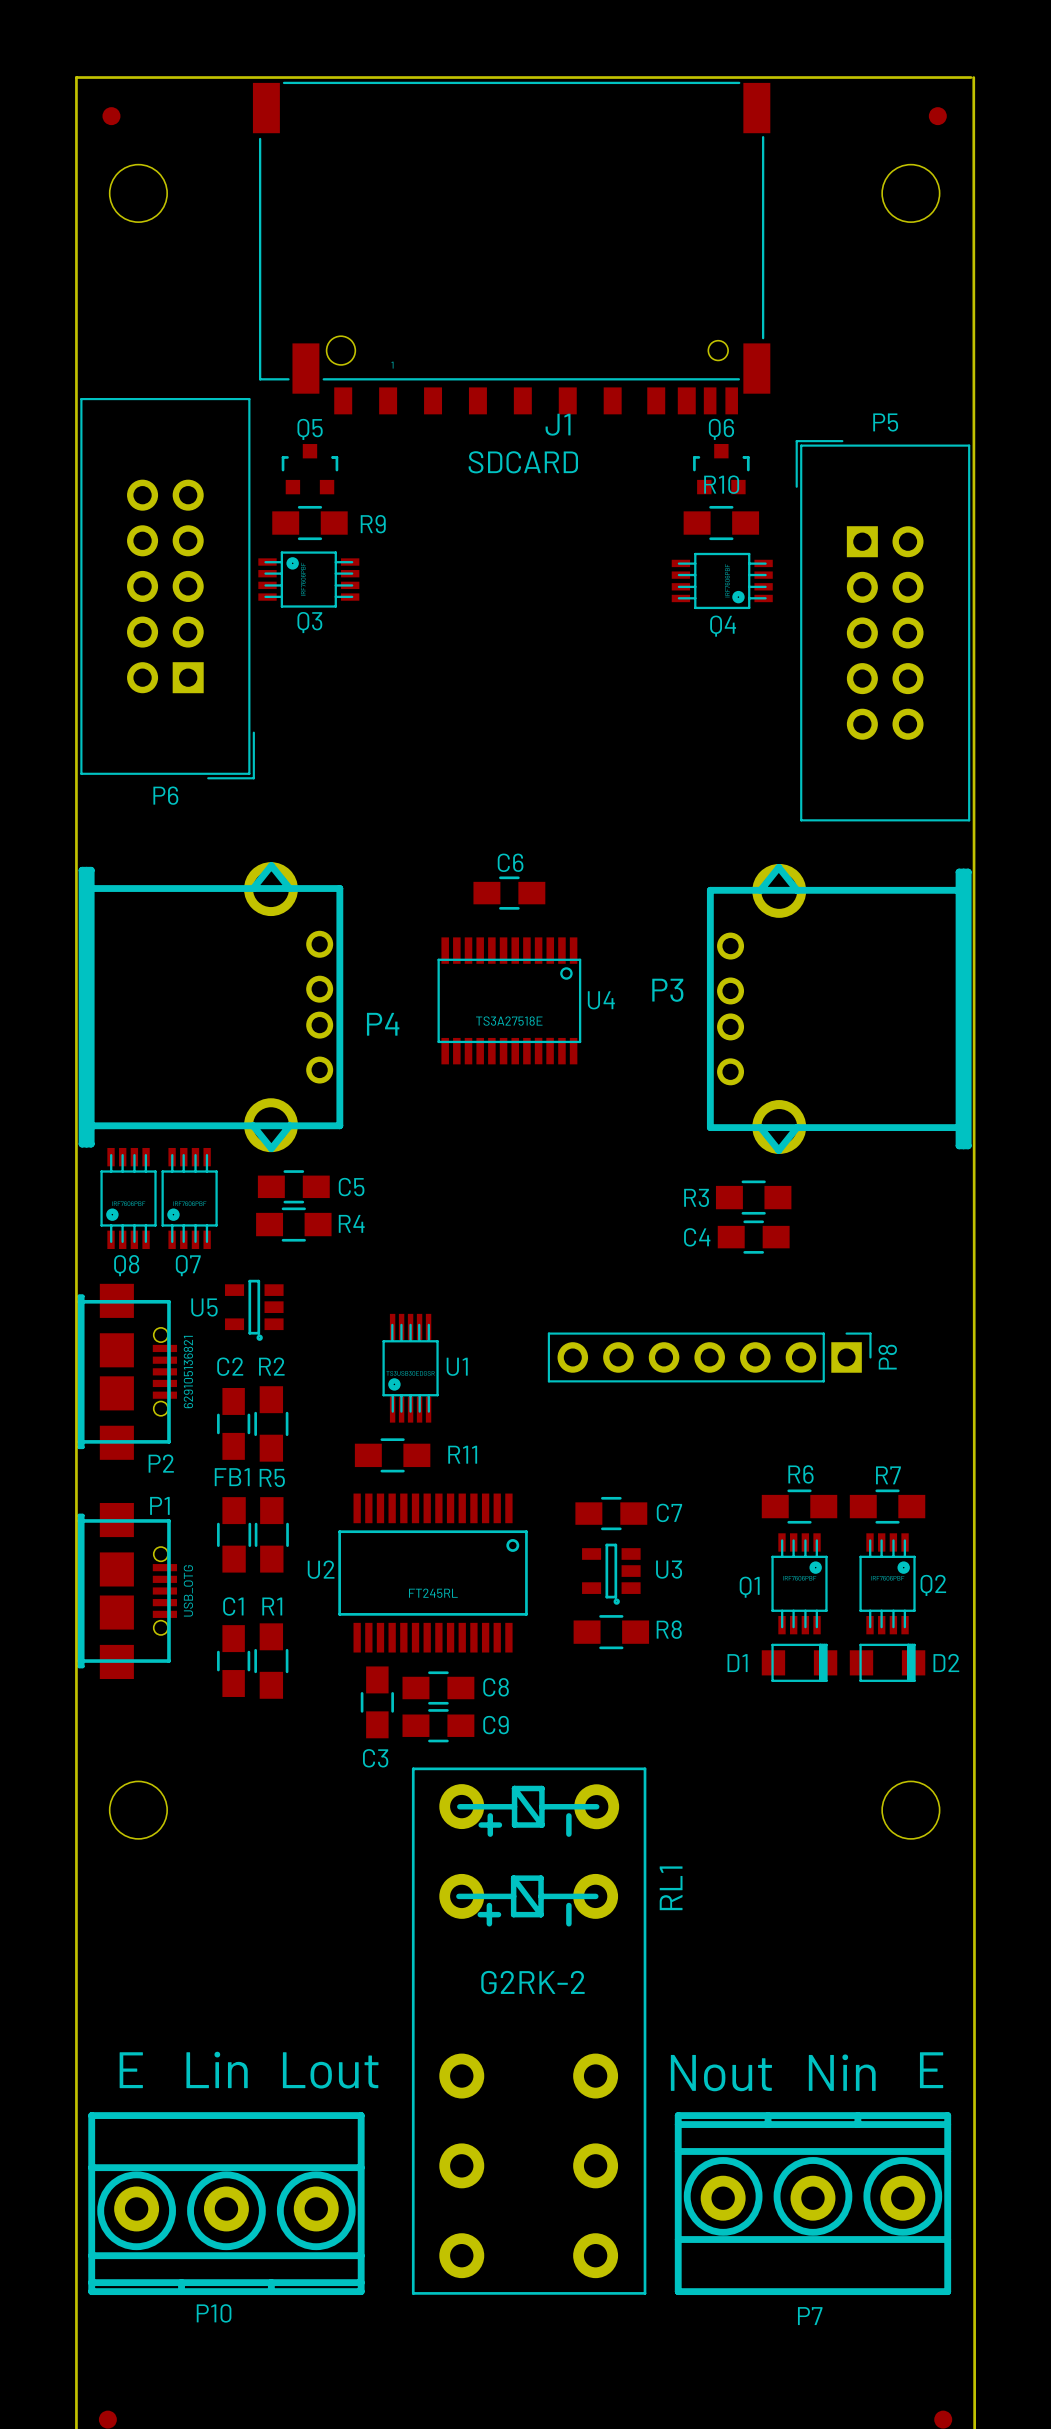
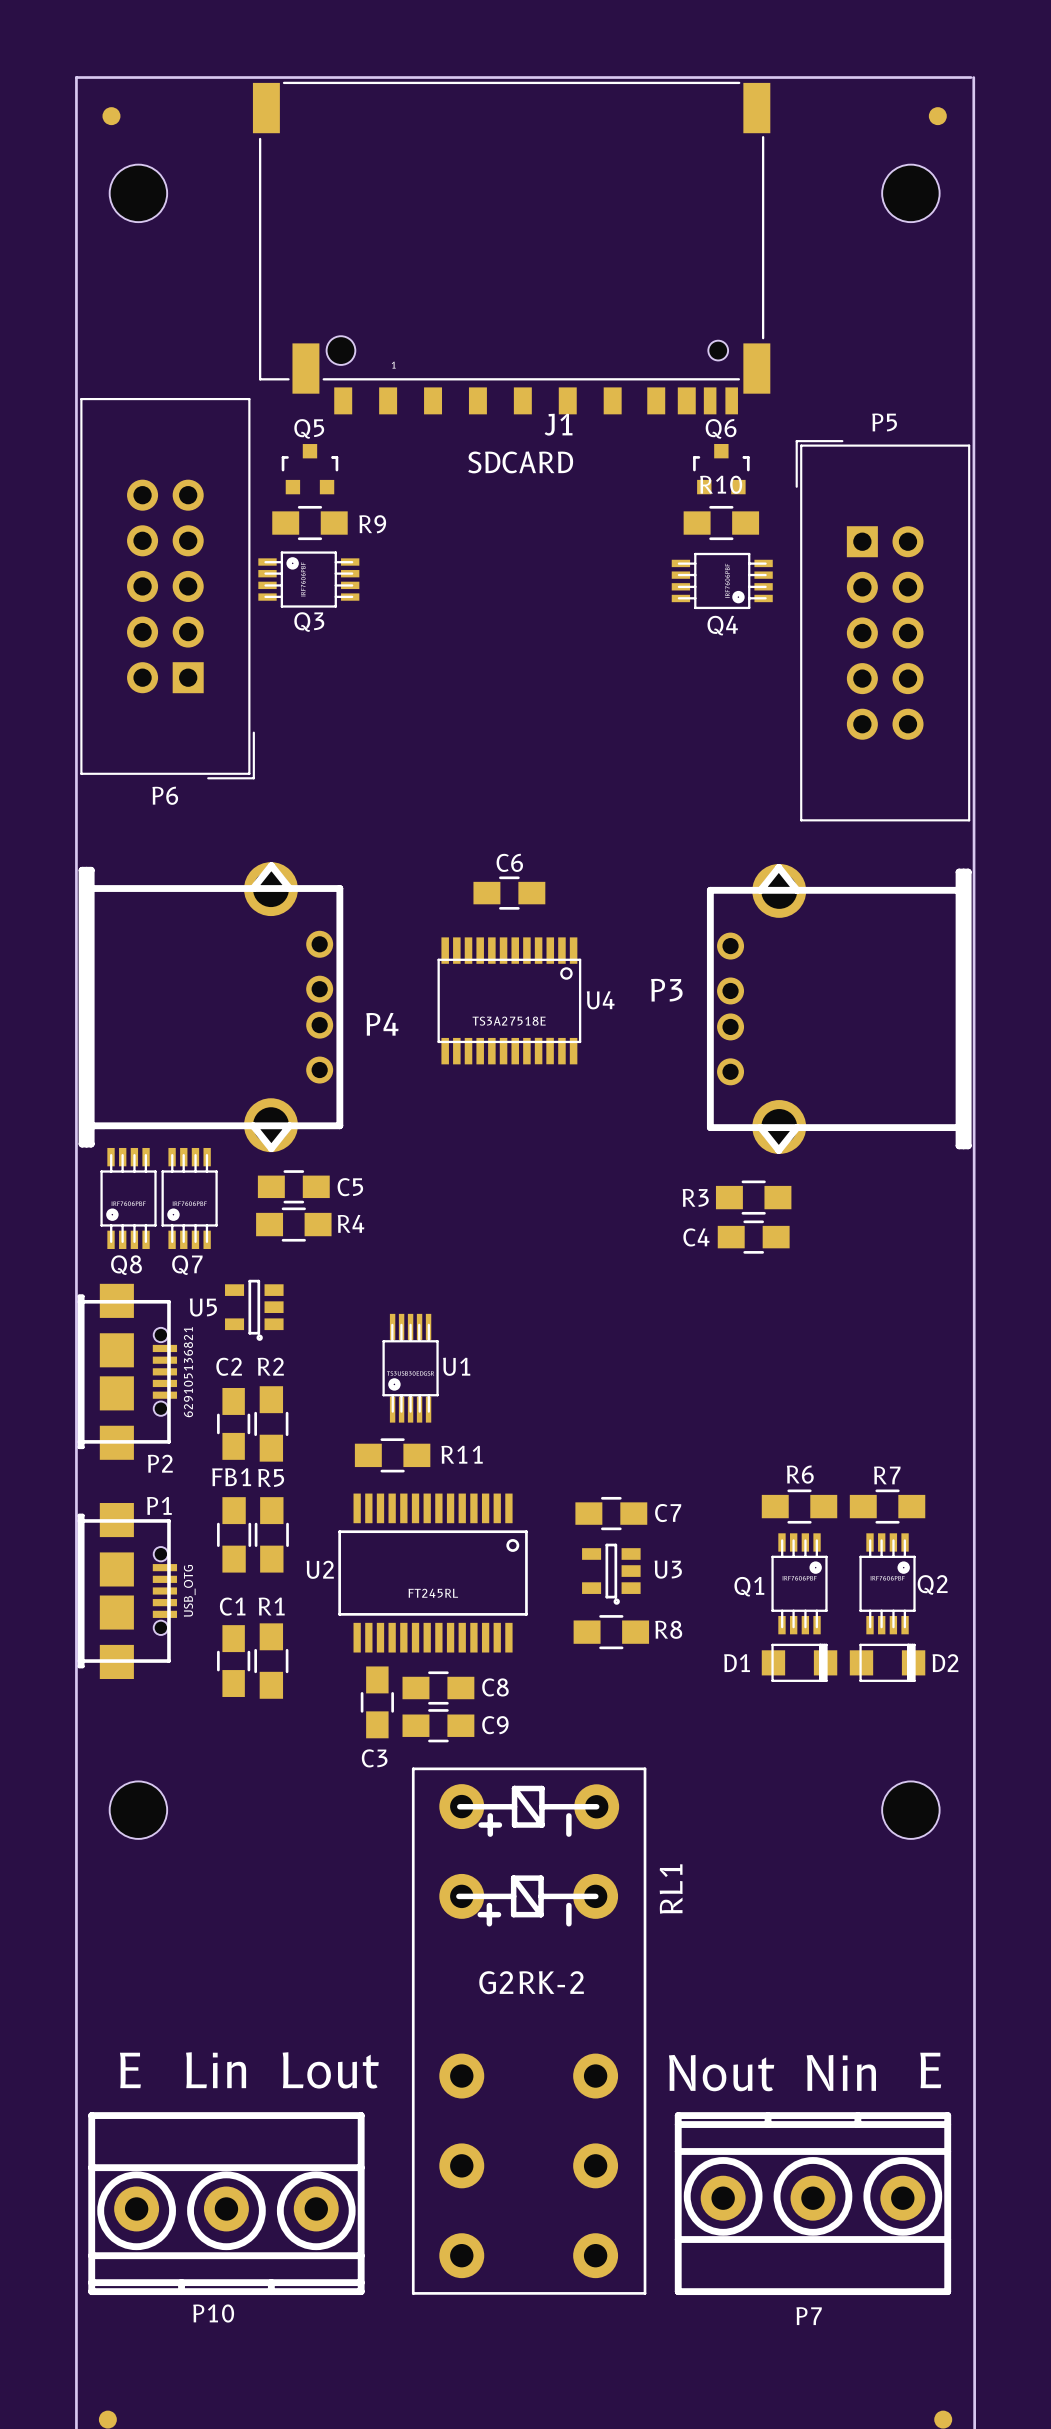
P8: (709, 1357) -> none

